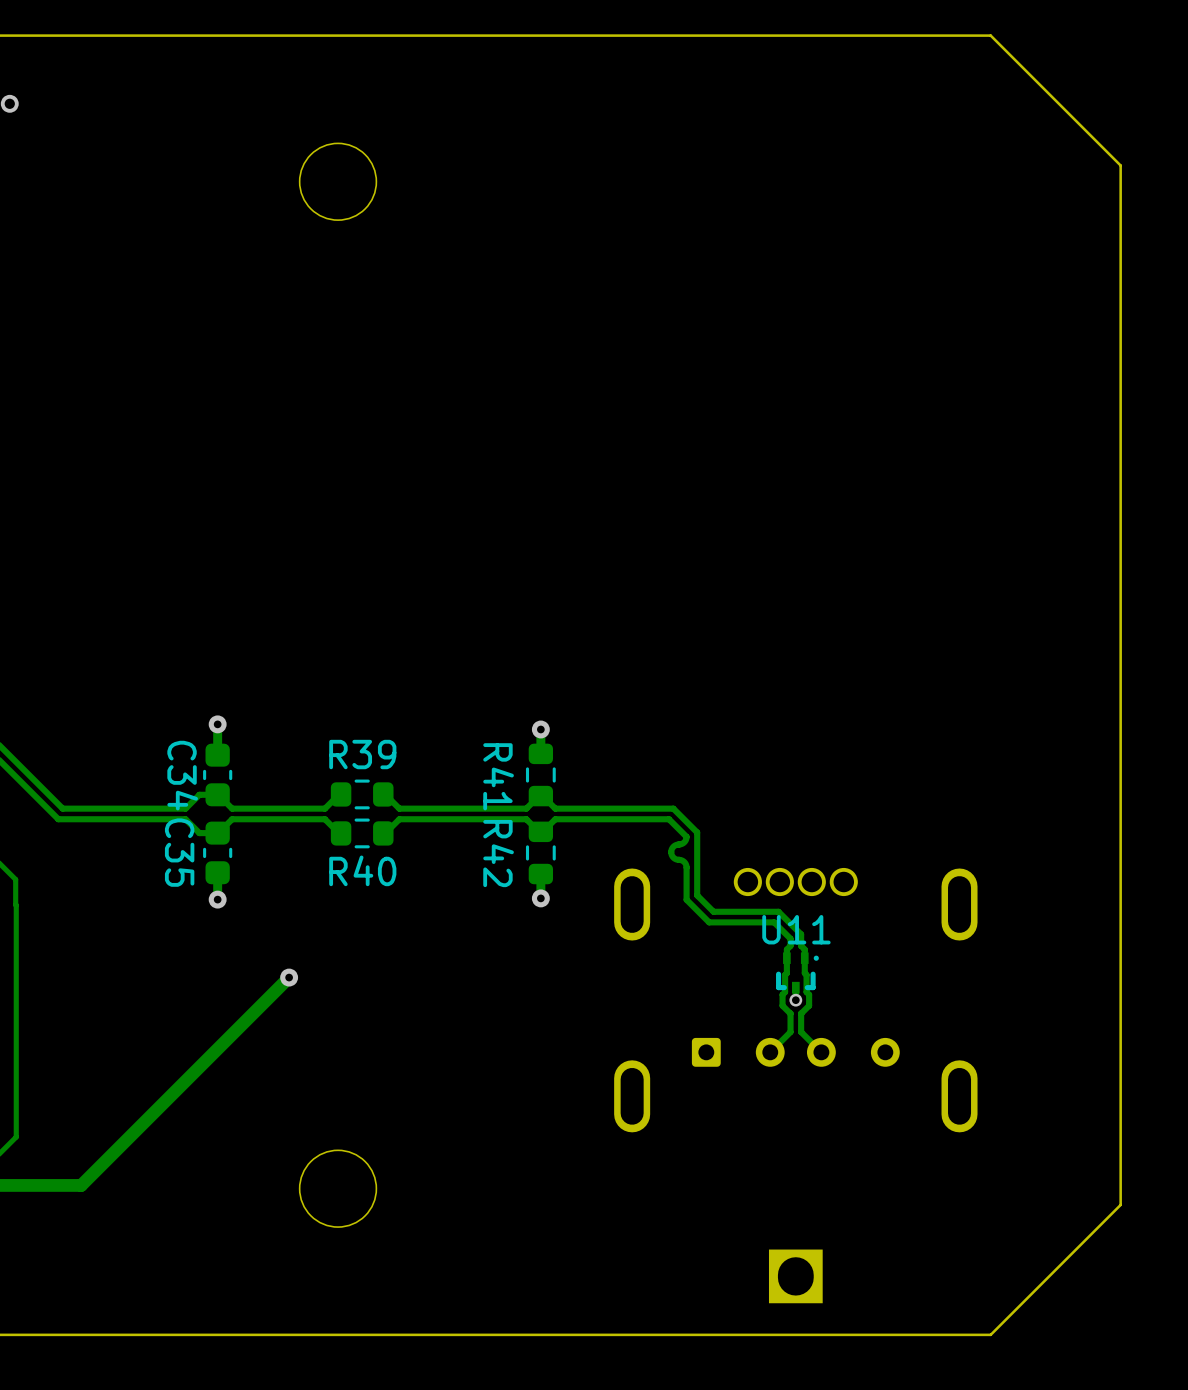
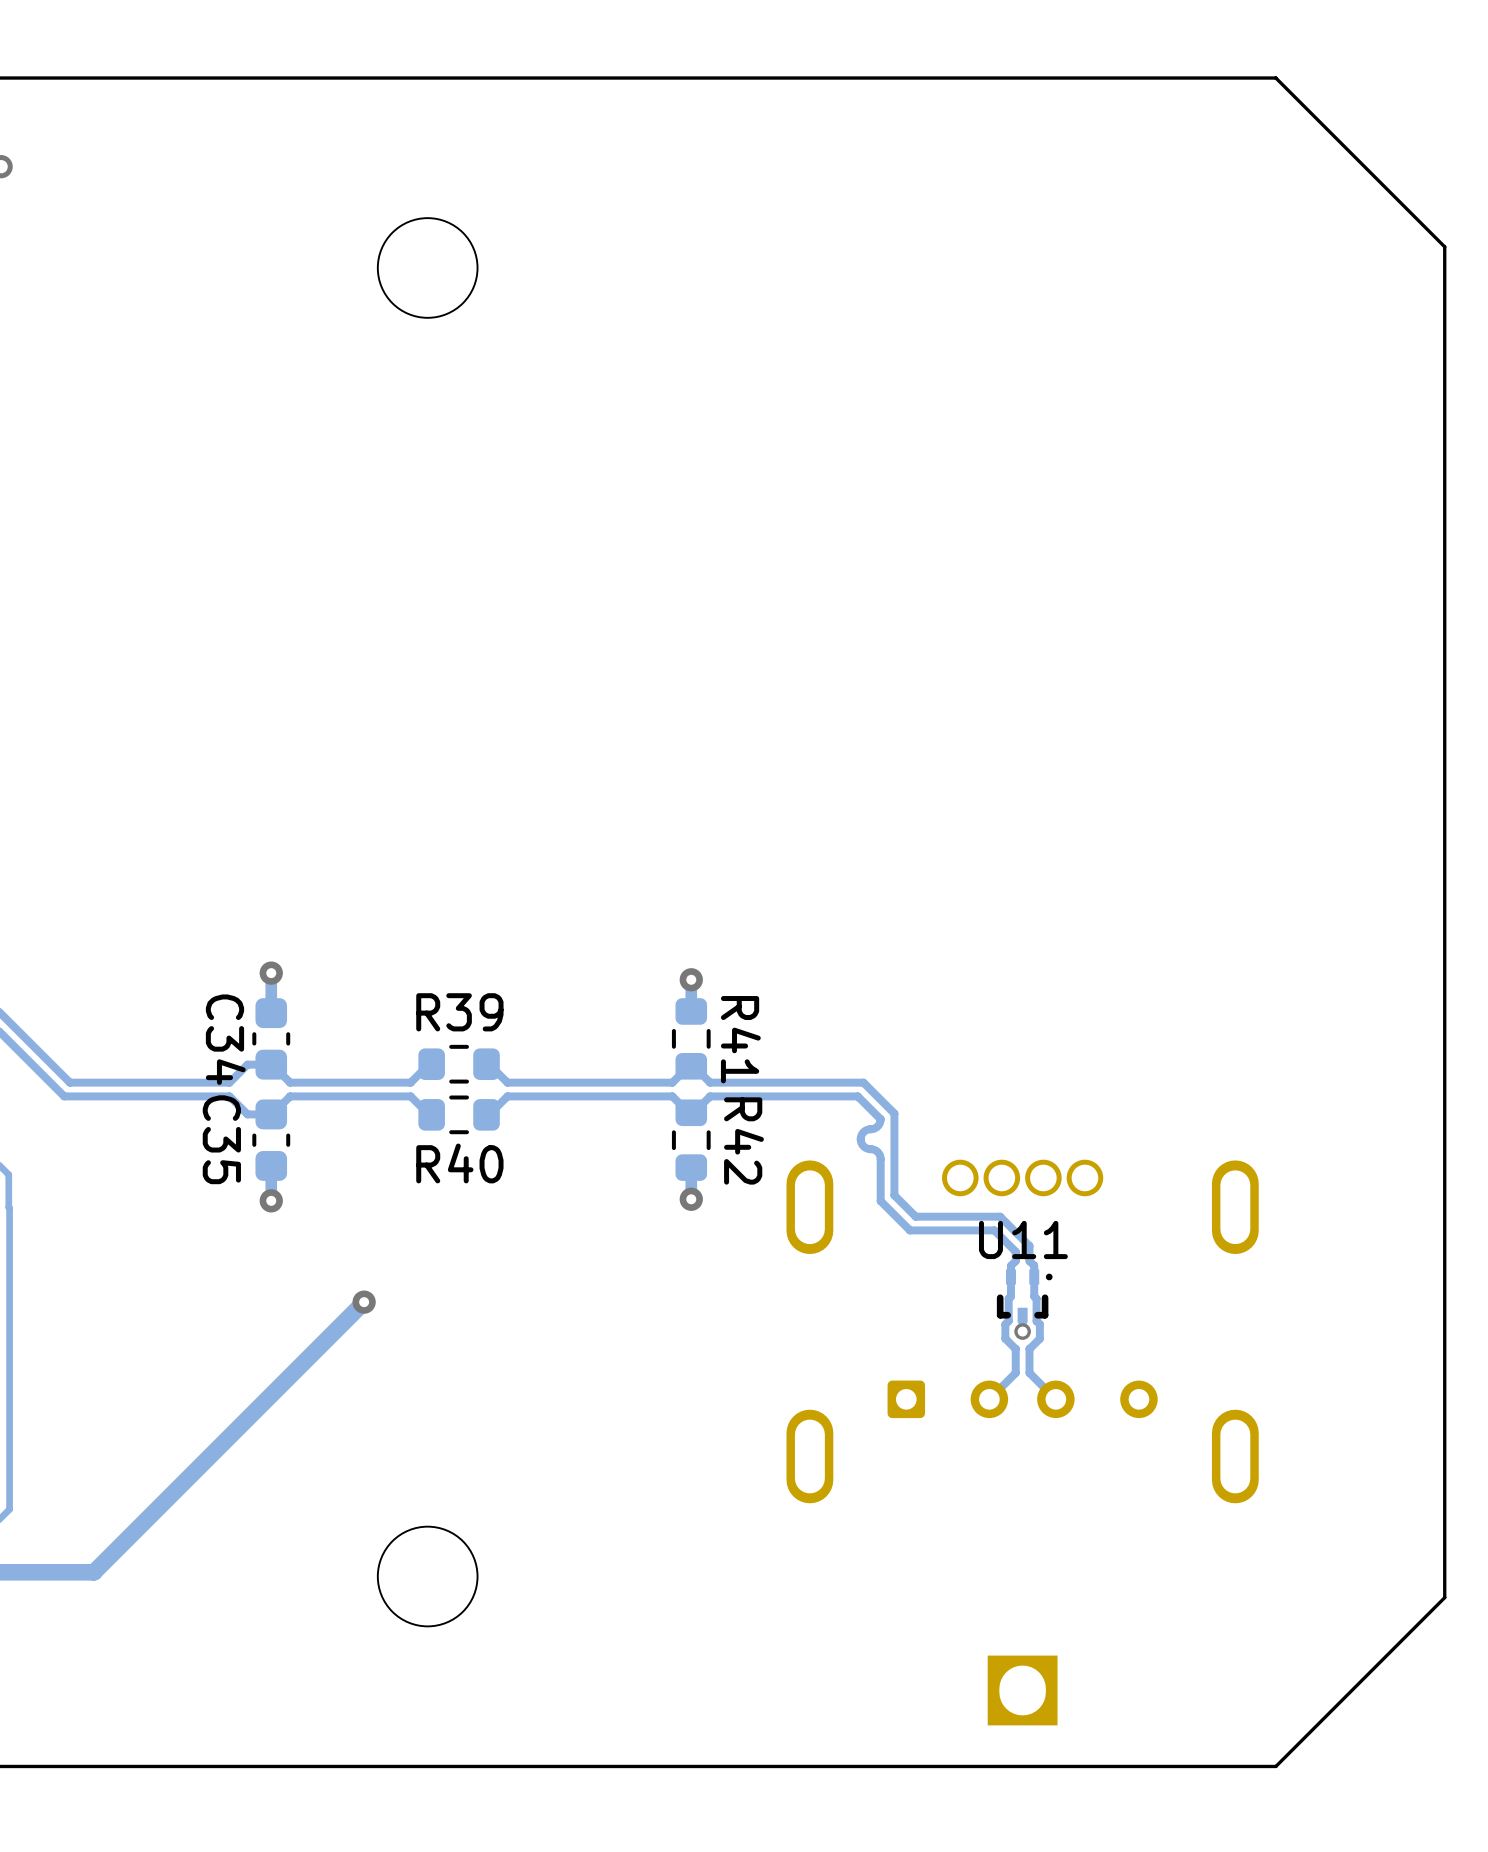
R41 name position: R41 (498, 776) -> R41 (740, 1039)
R42 name position: R42 (498, 853) -> R42 (743, 1140)

